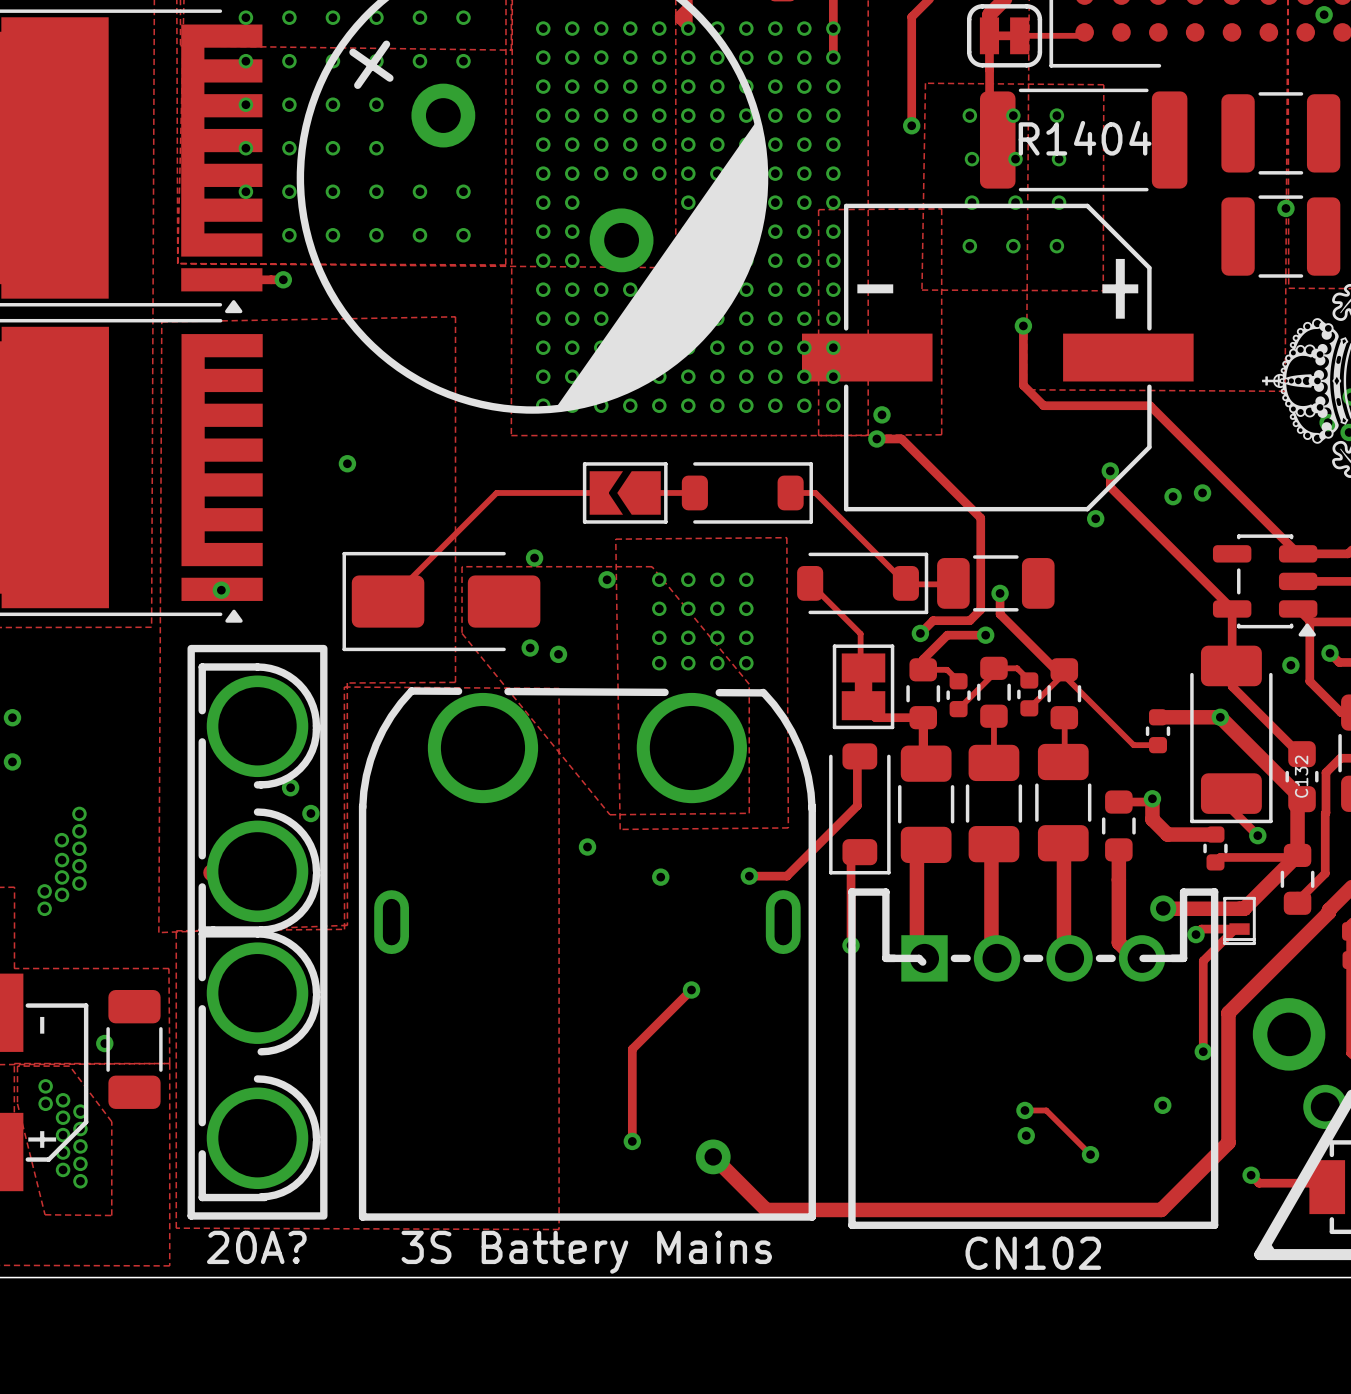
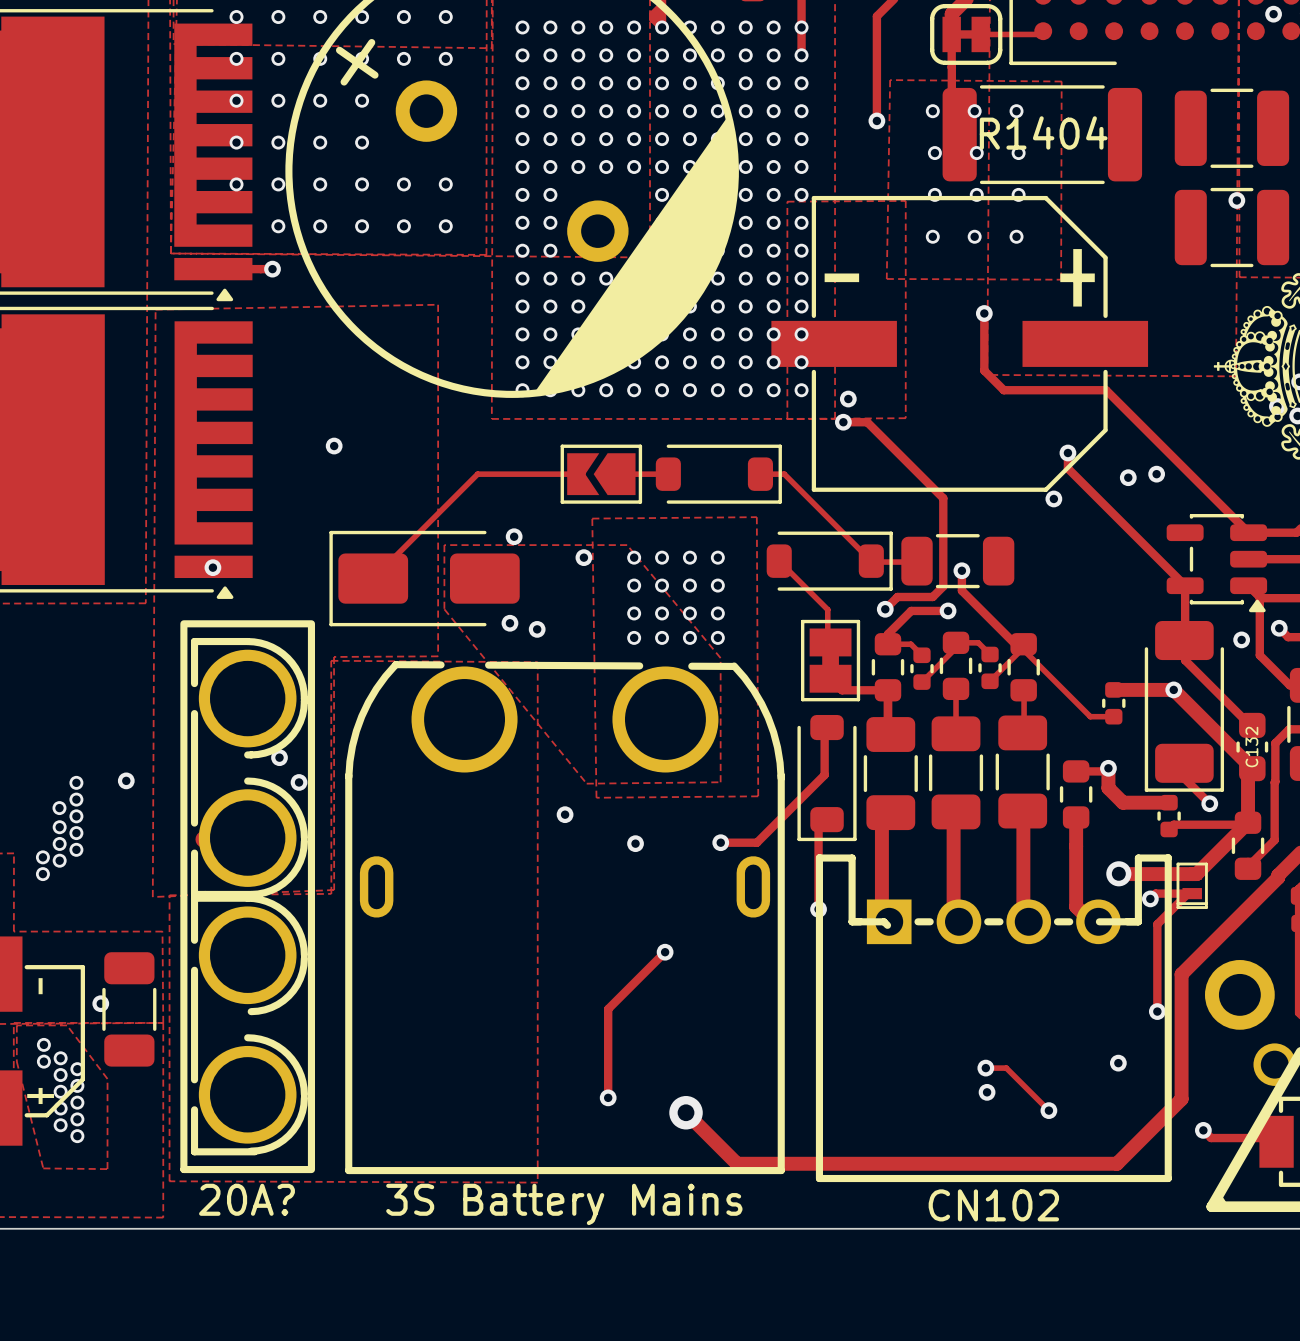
via: (12, 717) -> none
via: (12, 761) -> none
via: none -> (126, 780)

